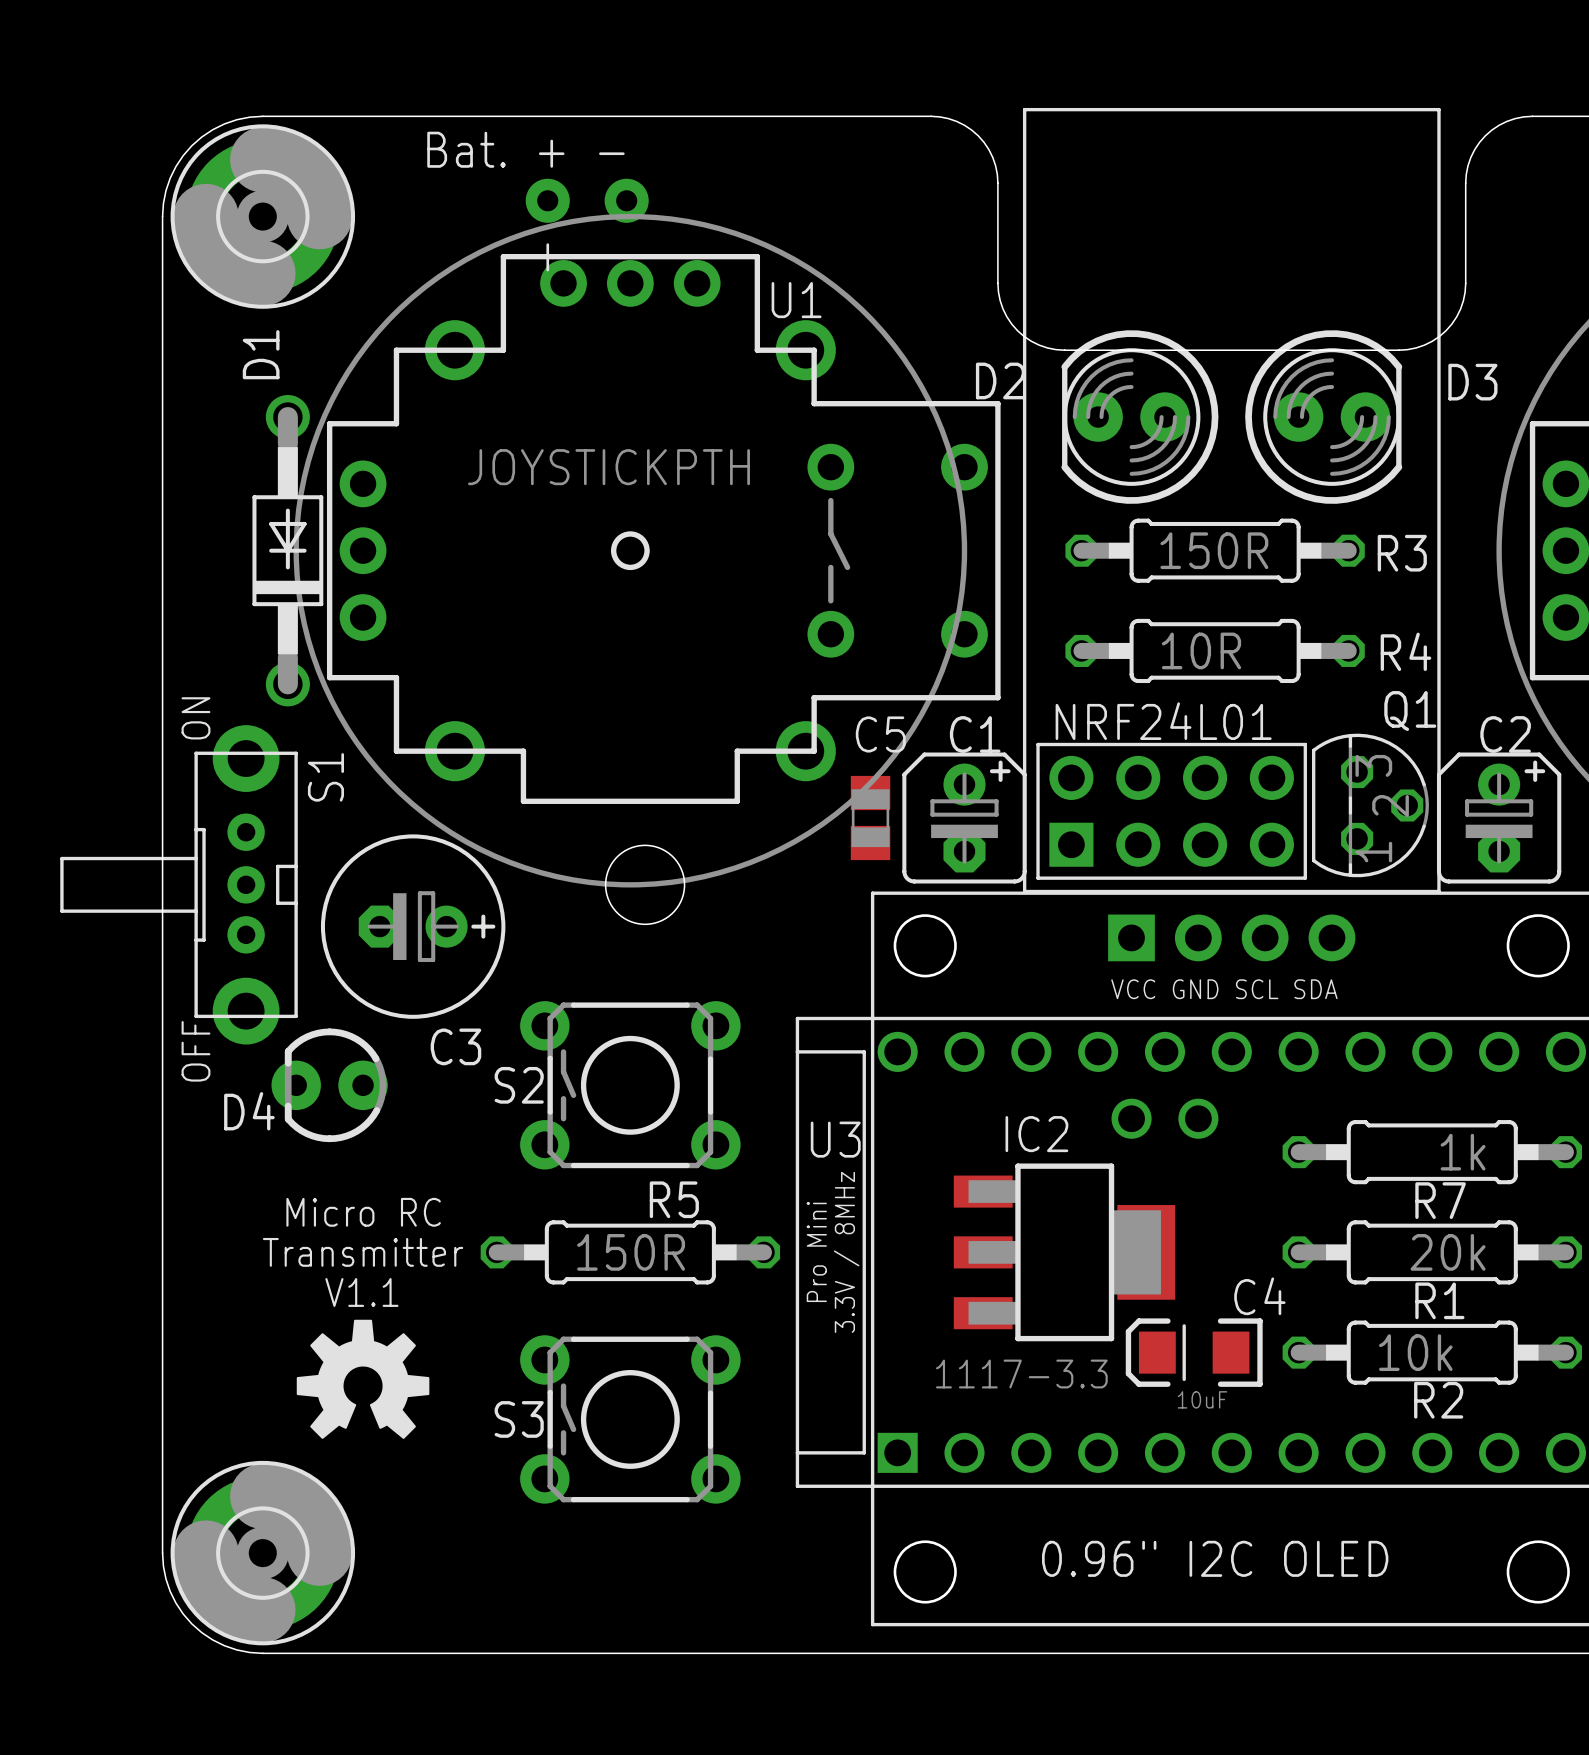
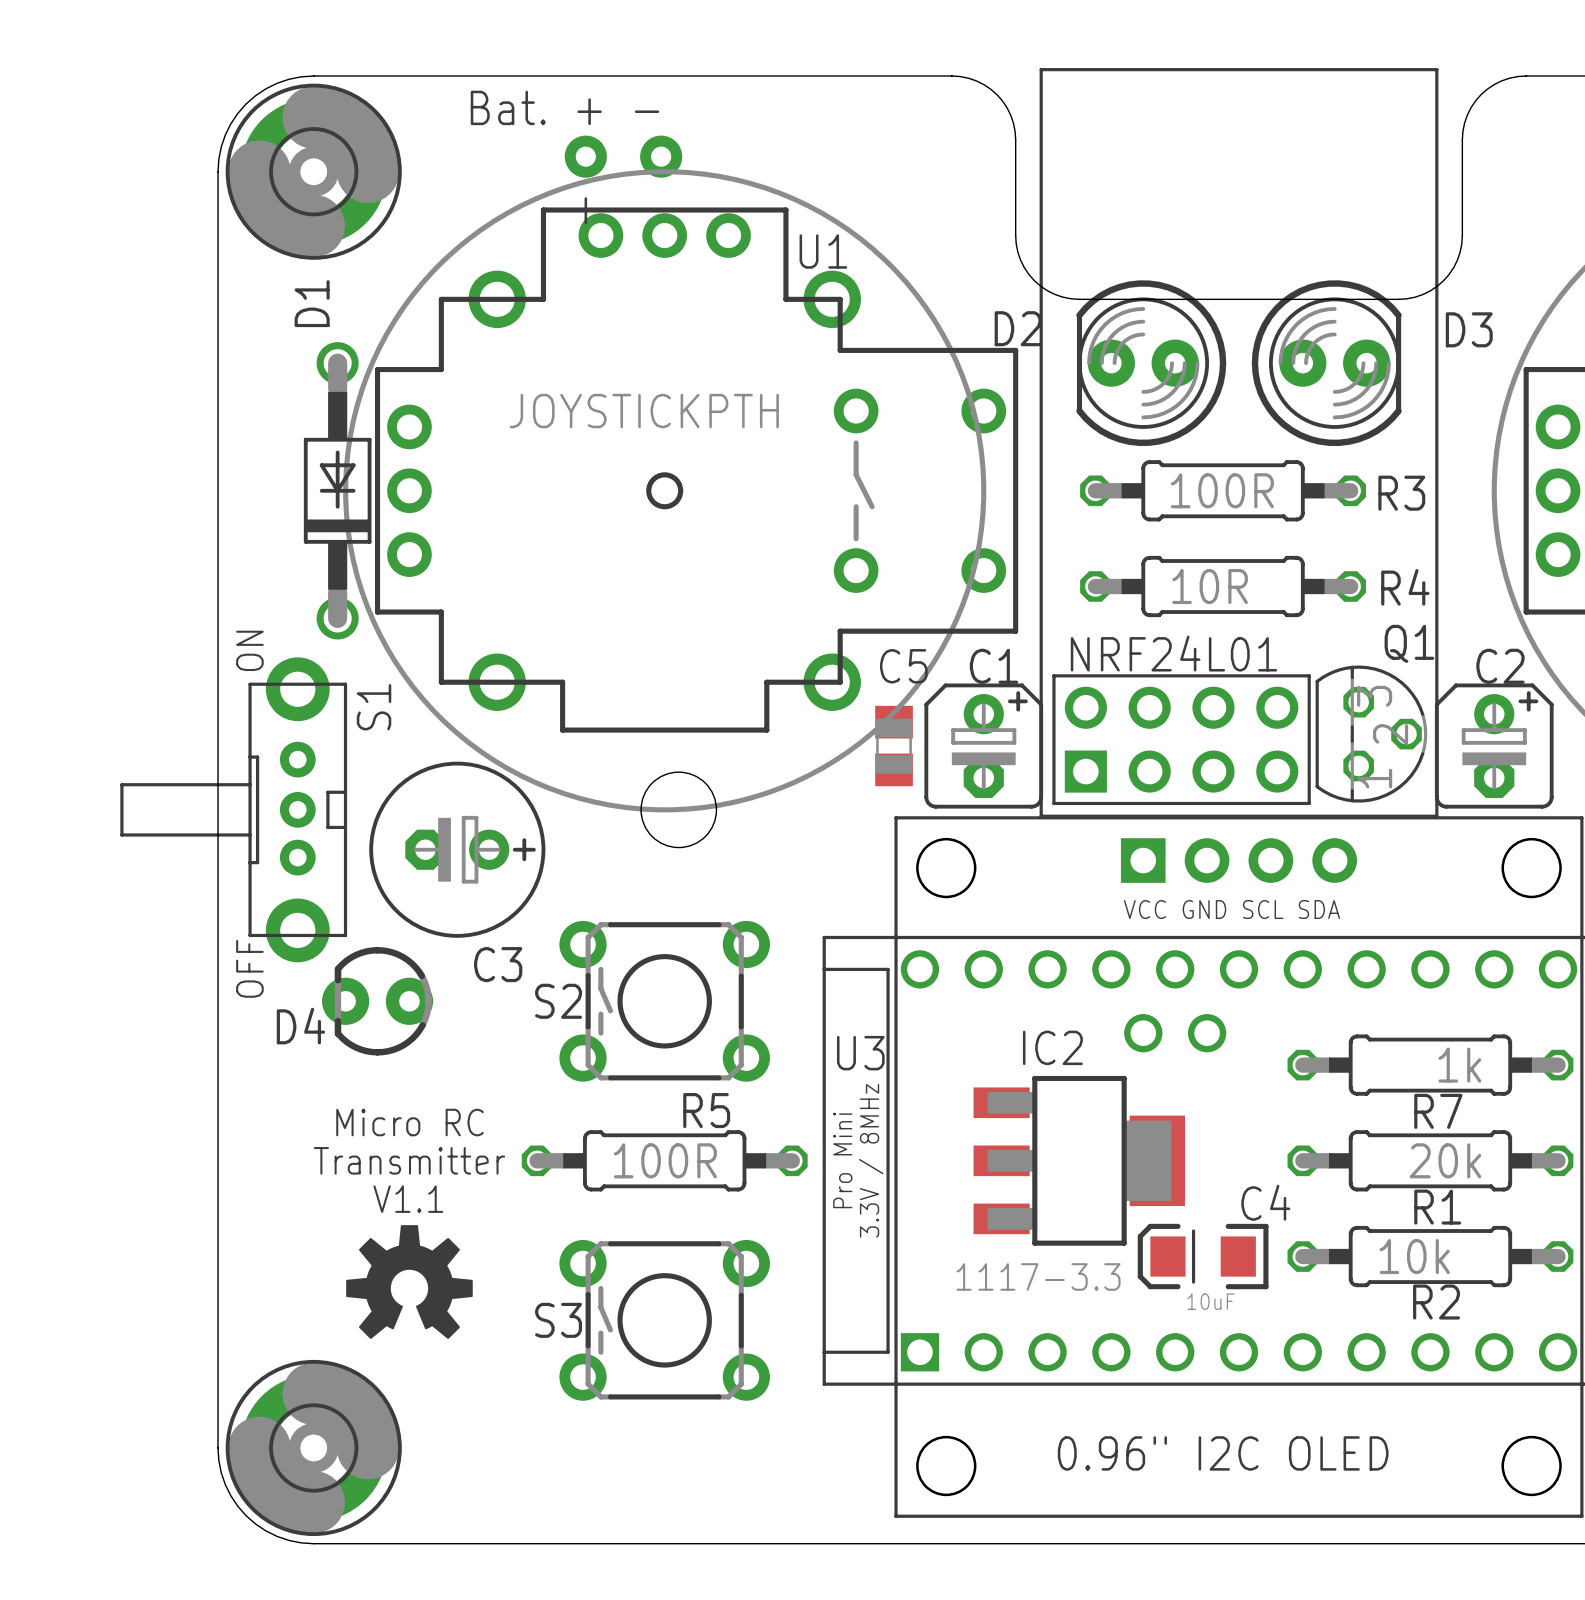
R3 value: 150R (1214, 550) -> 100R (1222, 490)
R5 value: 150R (631, 1252) -> 100R (665, 1160)

